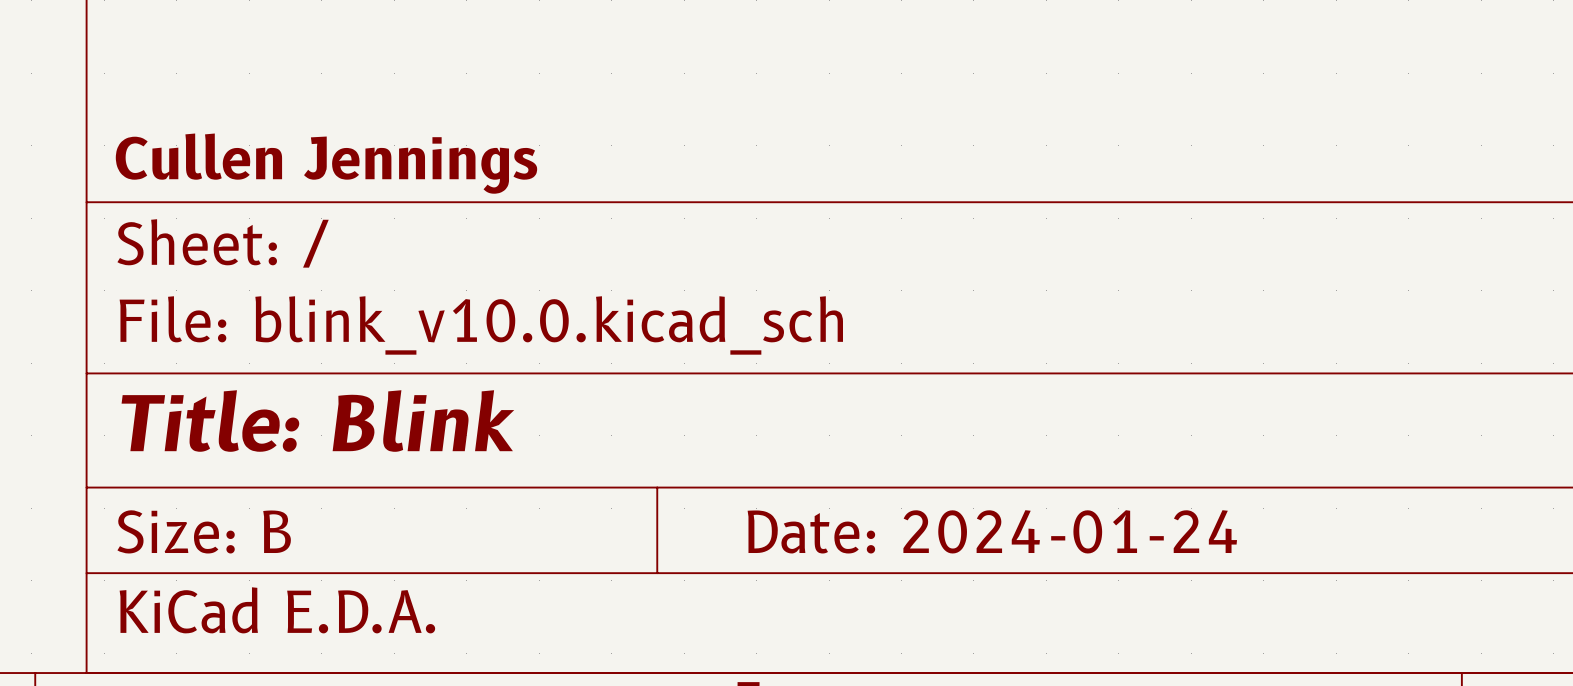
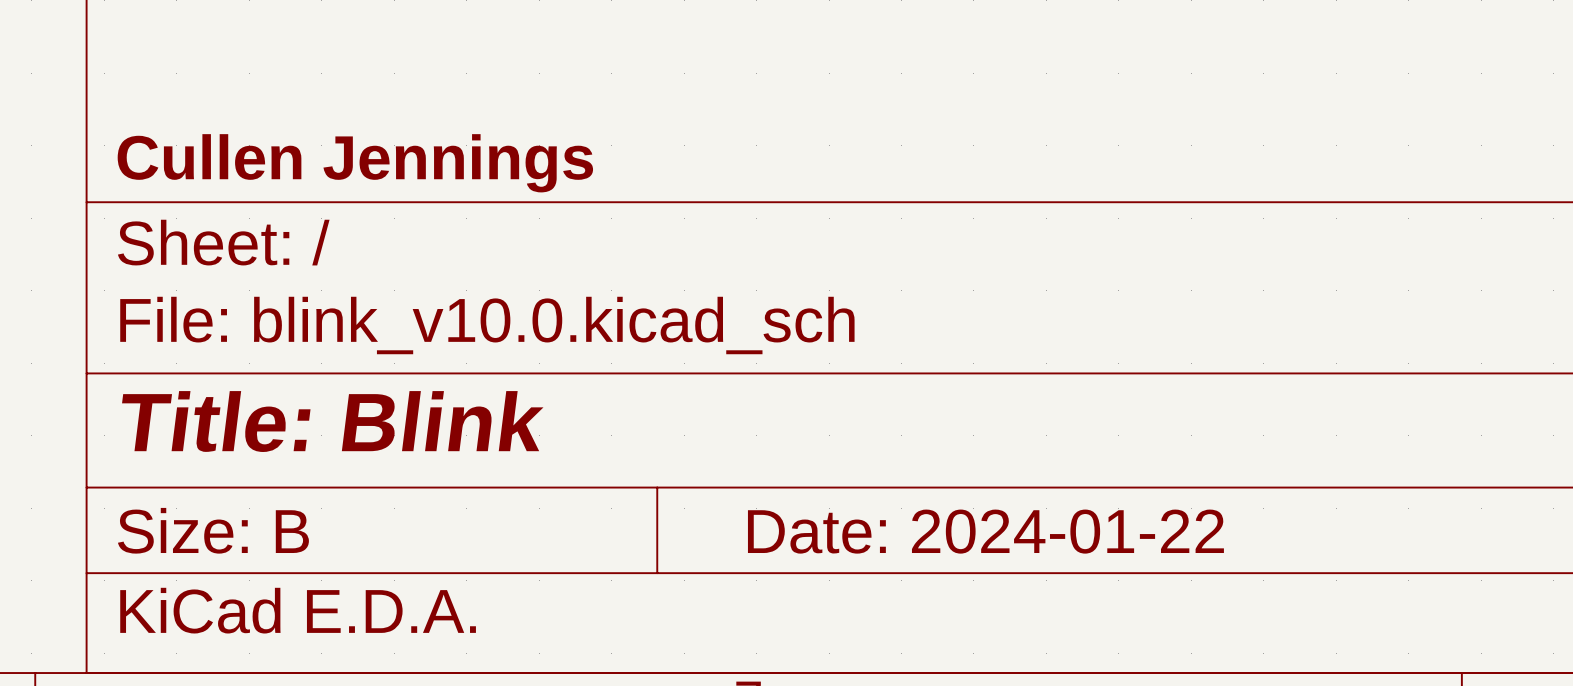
title block: Date: 2024-01-24 (992, 531) -> Date: 2024-01-22 (985, 531)

